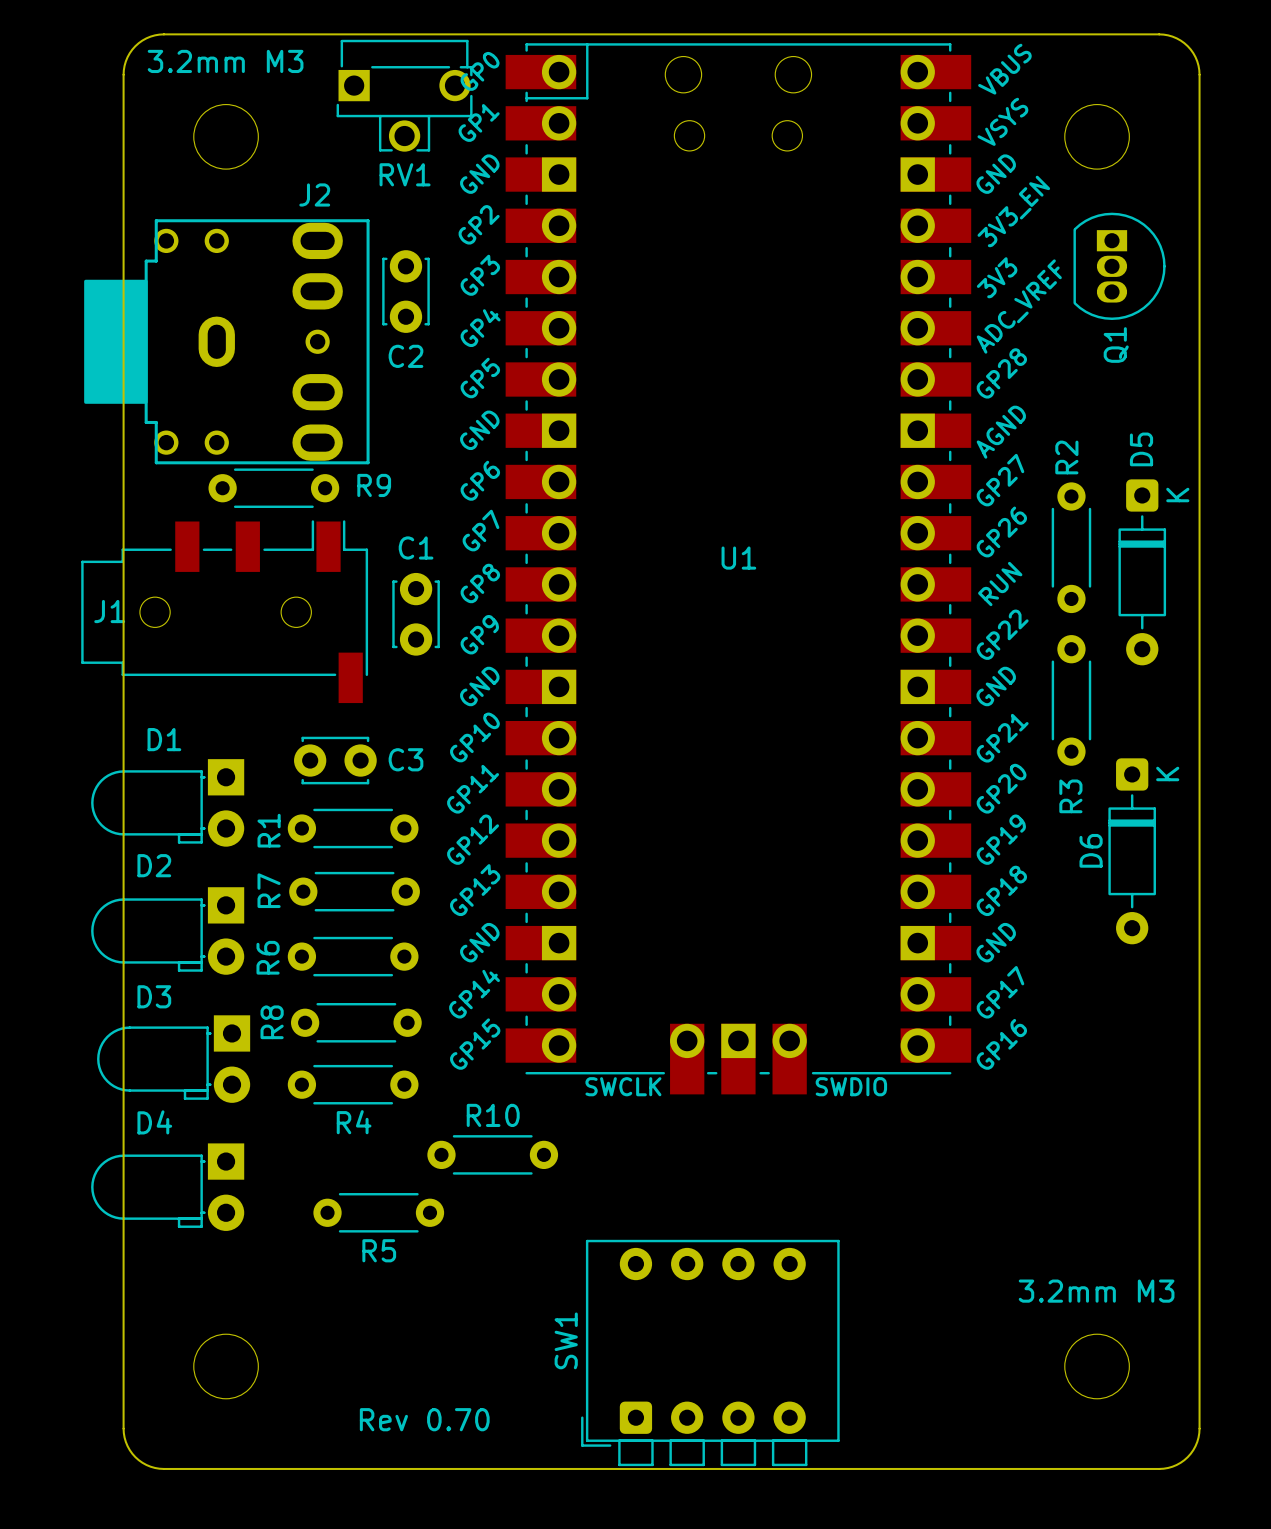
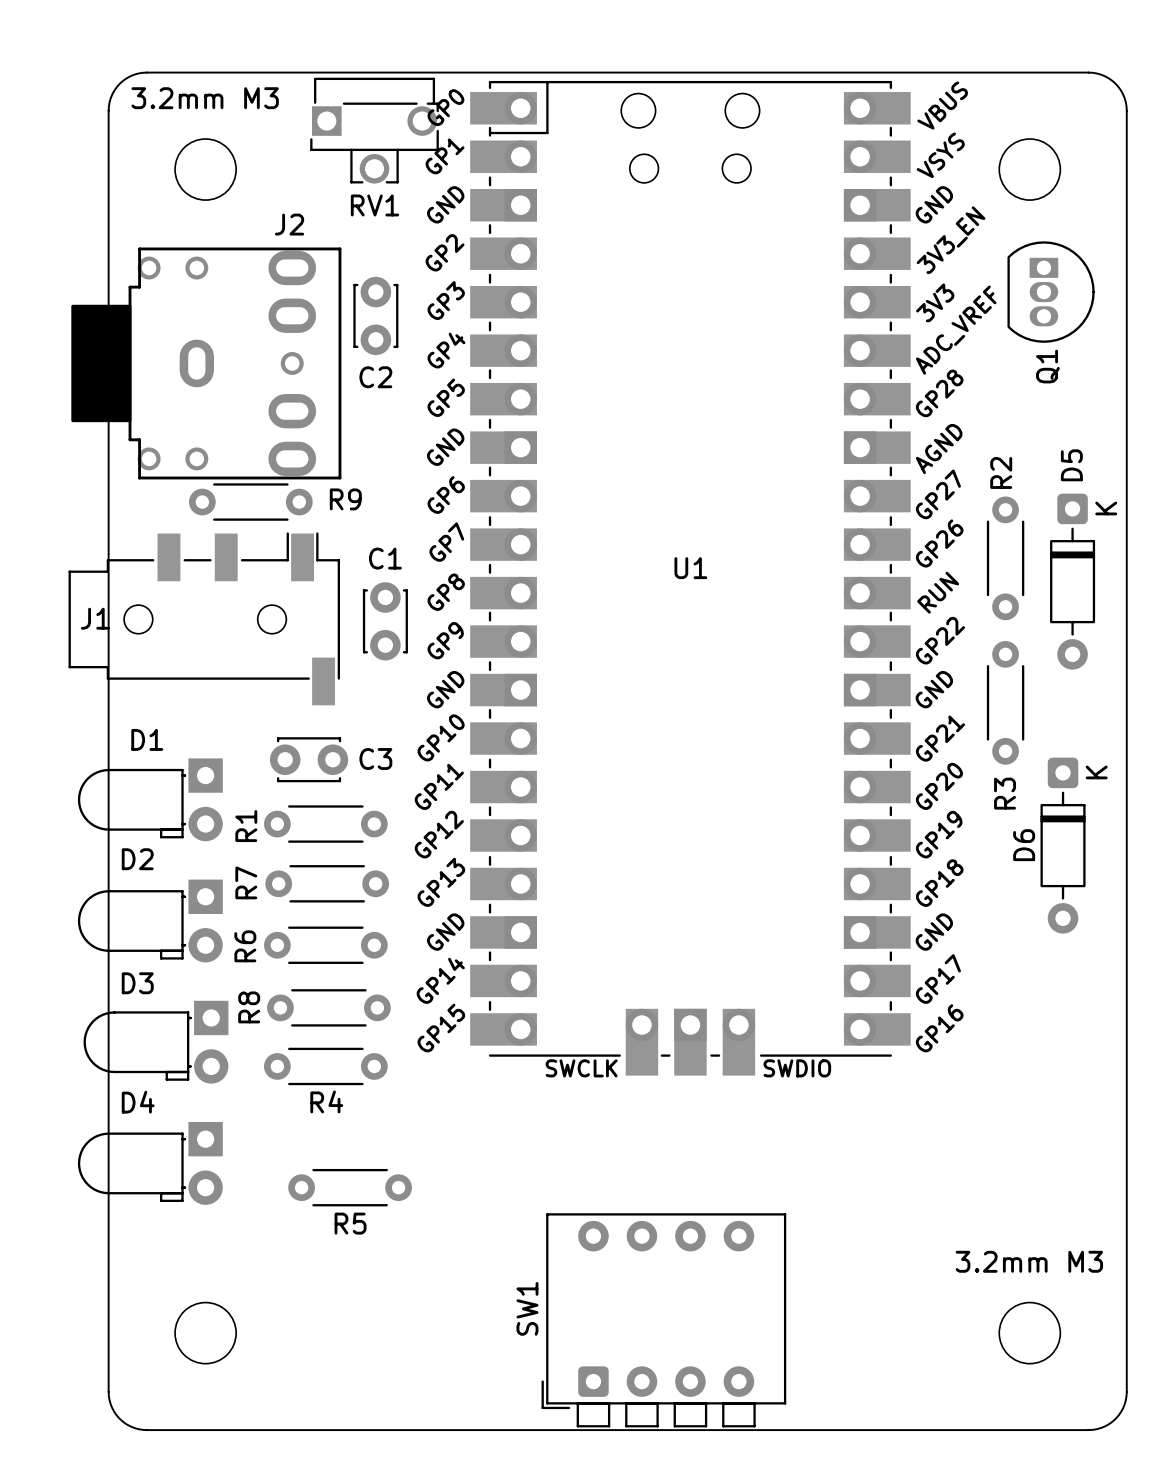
R10: (492, 1154) -> none
text: Rev 0.70 (424, 1419) -> none

